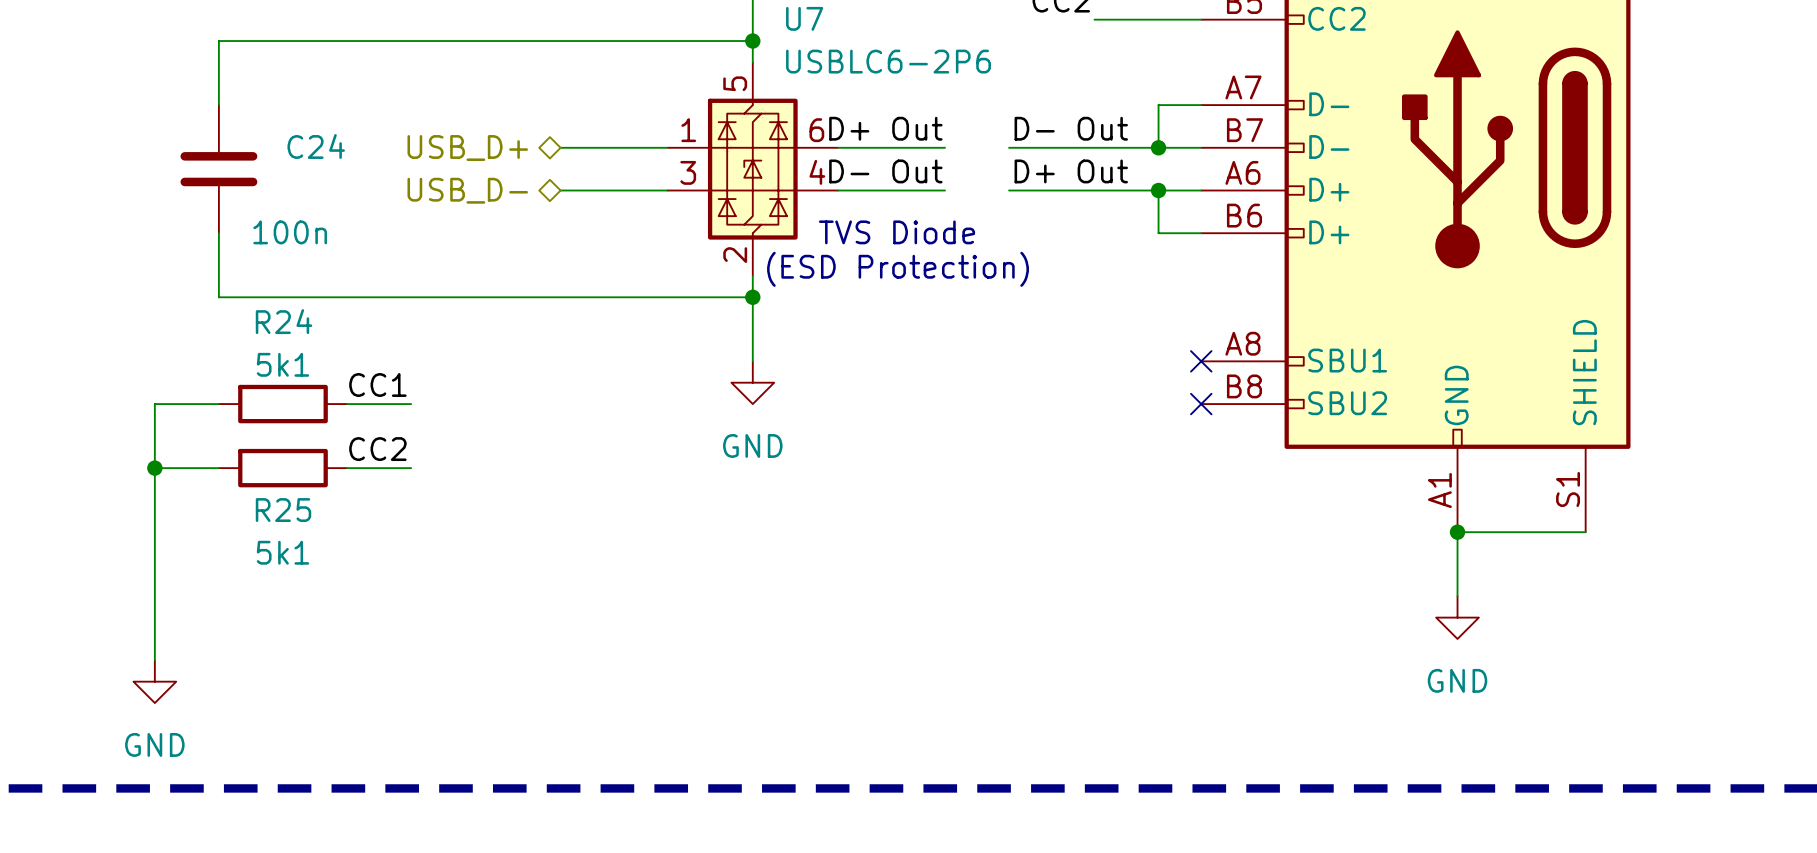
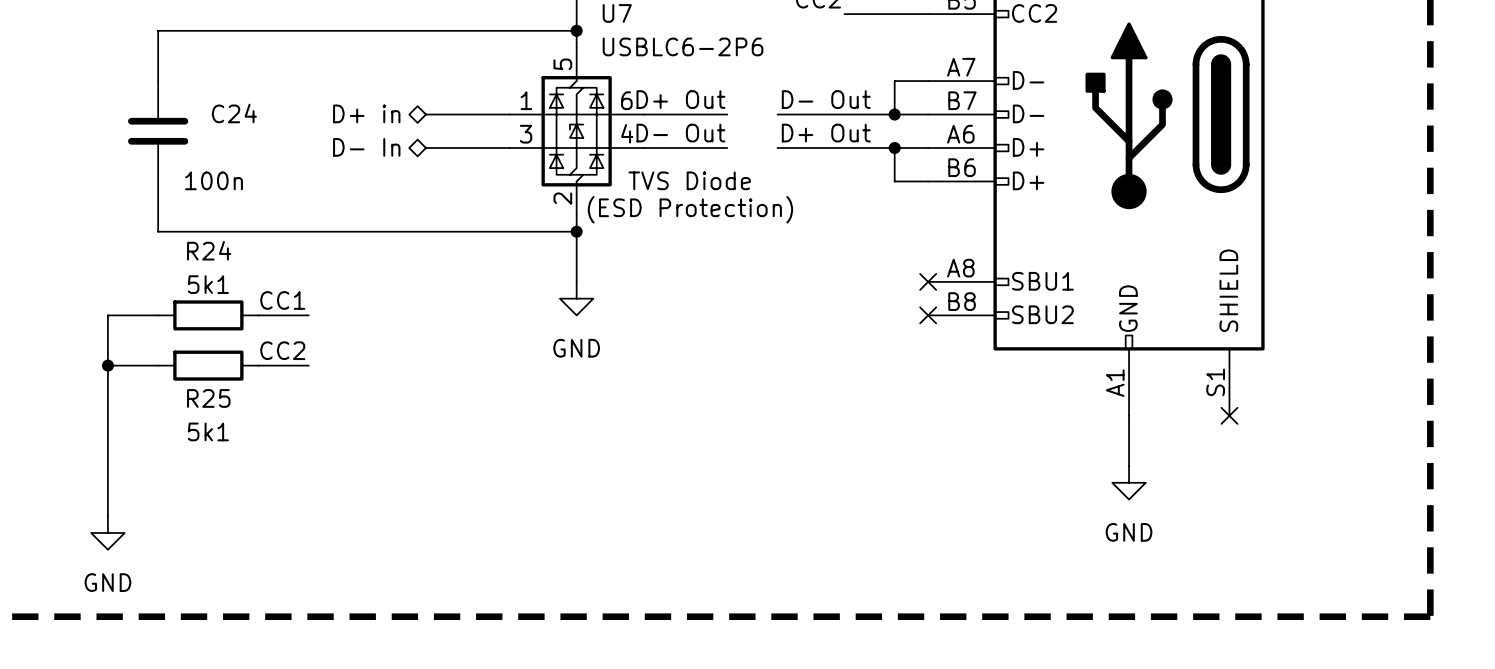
hierarchical label: USB_D+ (467, 148) -> D+ in (366, 113)
hierarchical label: USB_D- (467, 190) -> D- In (366, 147)
wire: (1457, 532) (1585, 532) -> none
junction: (1457, 532) -> none
no-connect mark: none -> (1229, 415)

